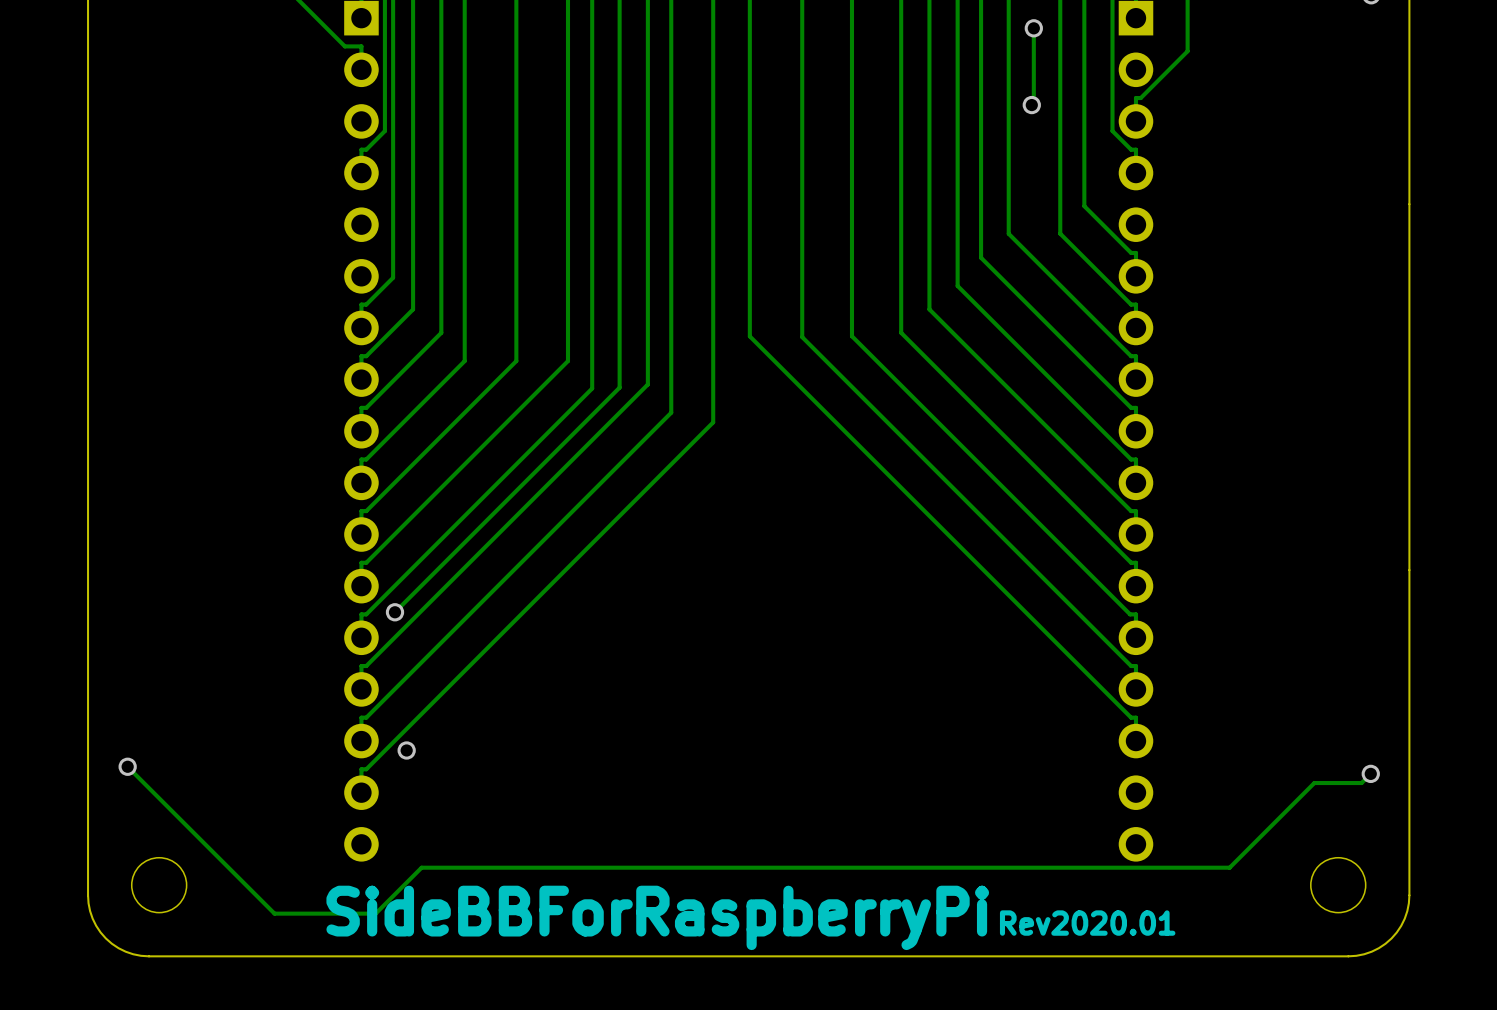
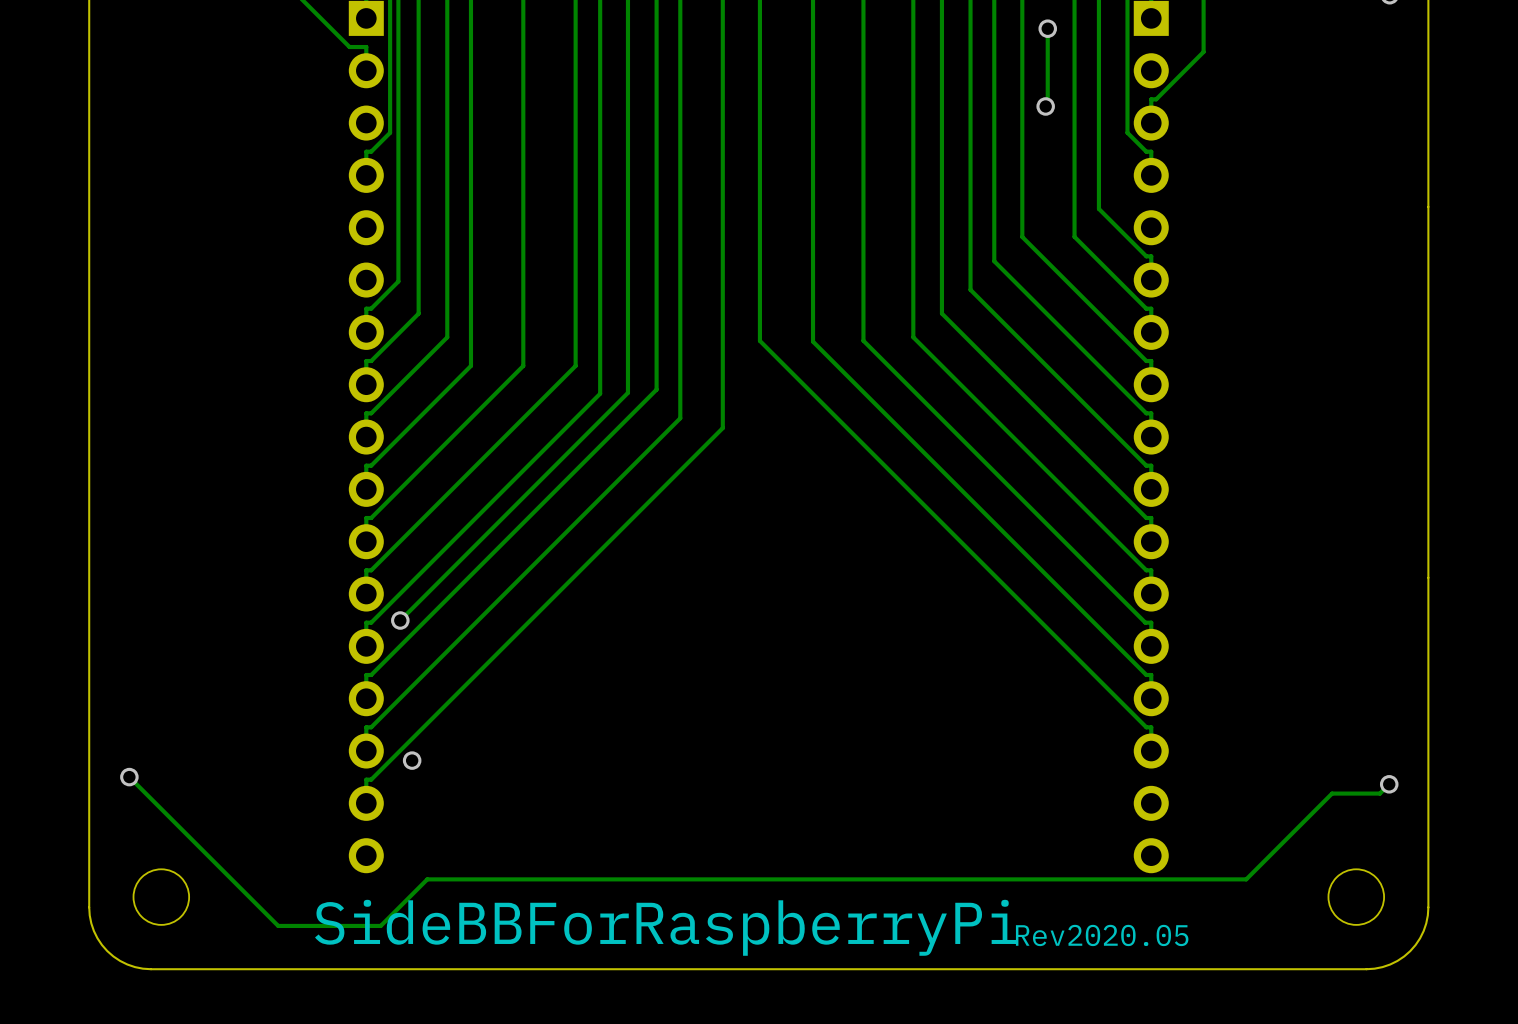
text: Rev2020.01 (1087, 923) -> Rev2020.05 (1102, 935)

